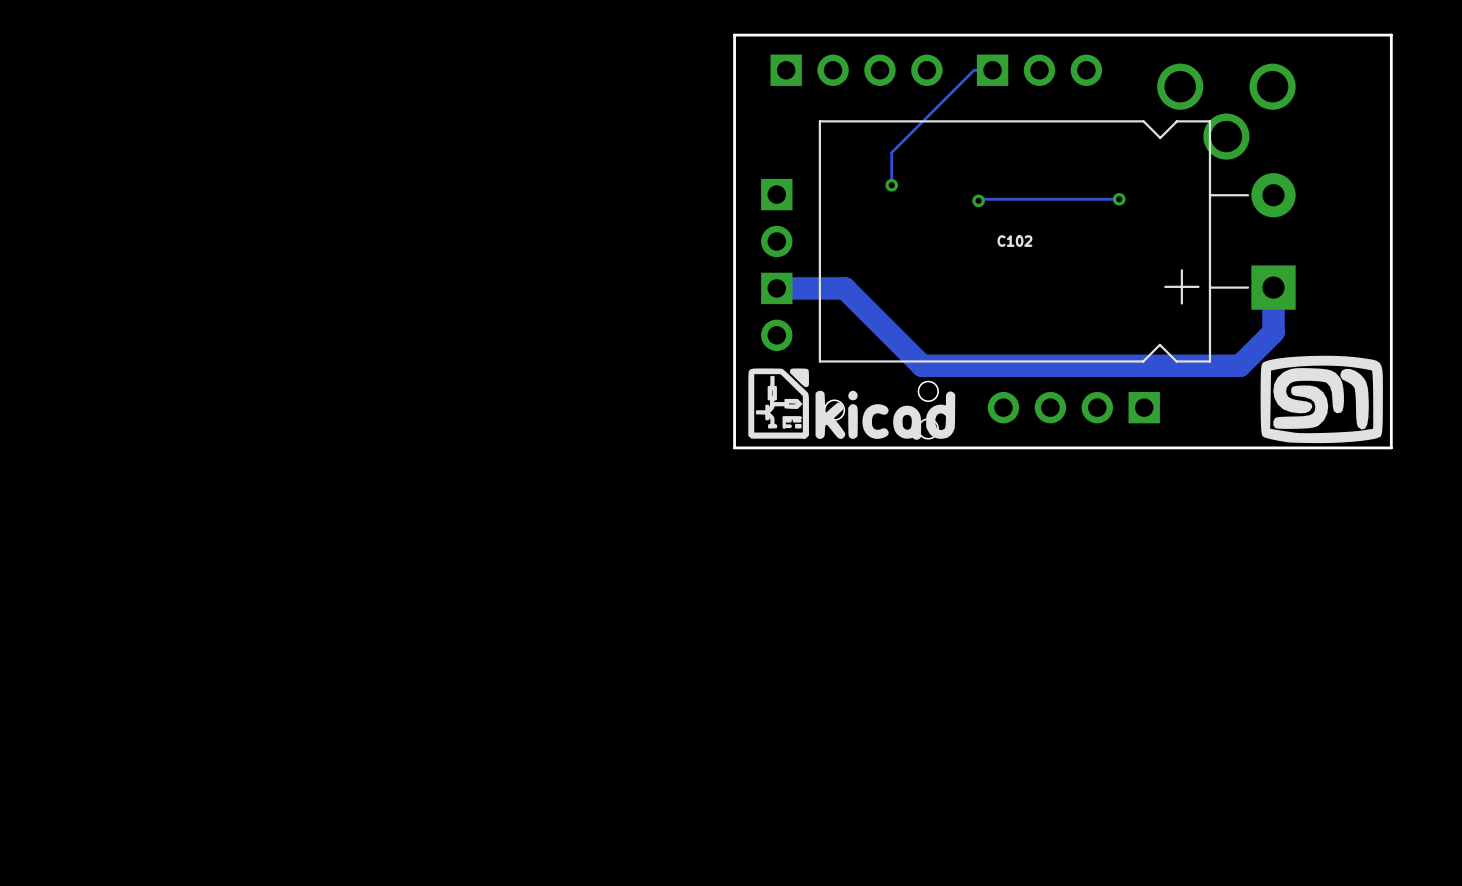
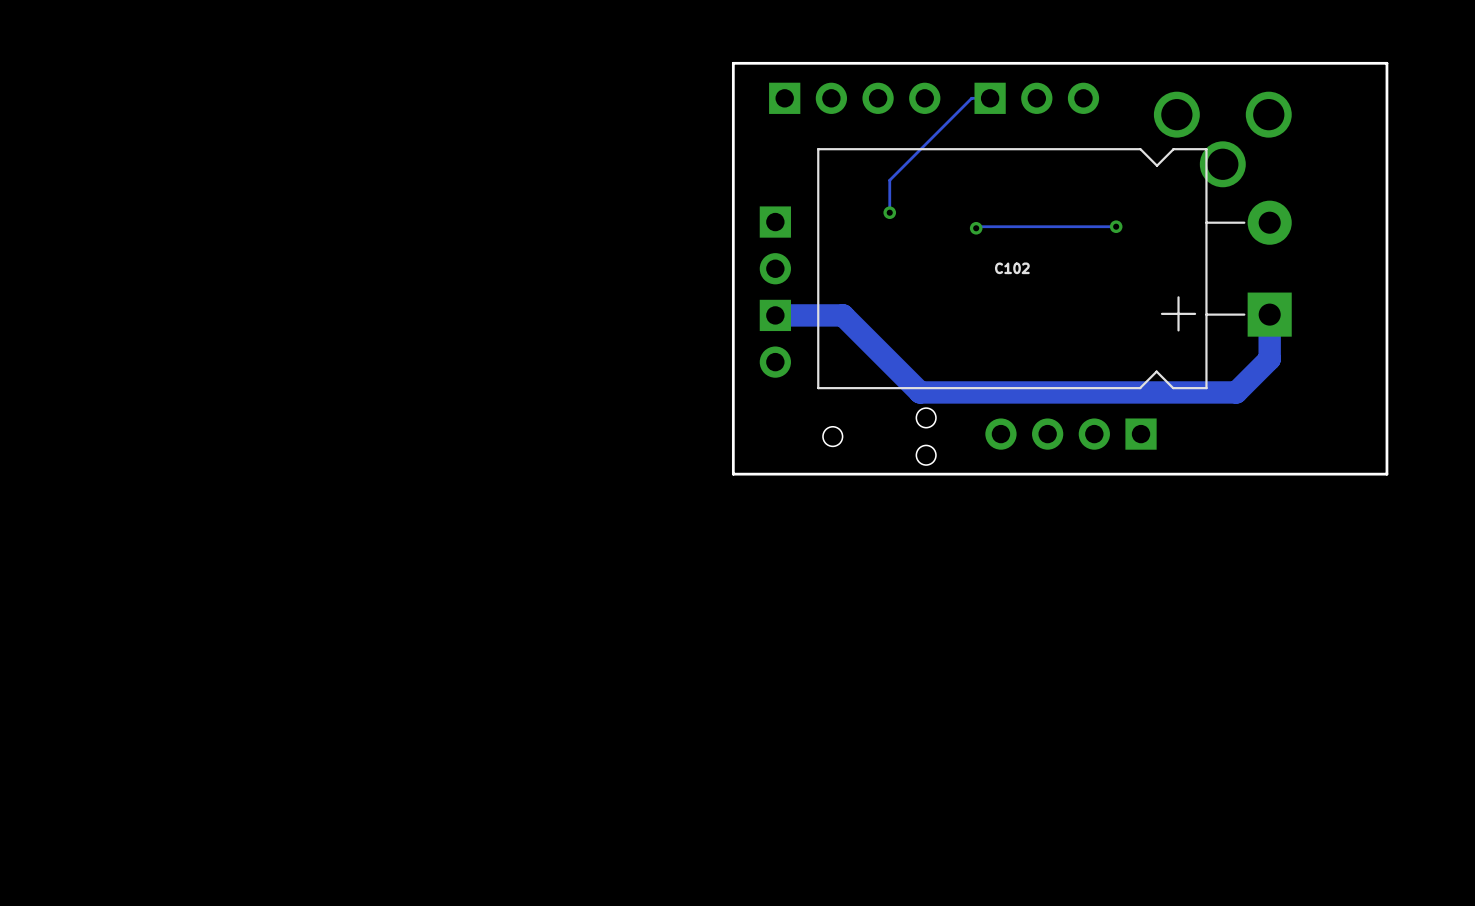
drawing: [1260, 355, 1383, 444] -> none
drawing: [748, 368, 956, 440] -> none

